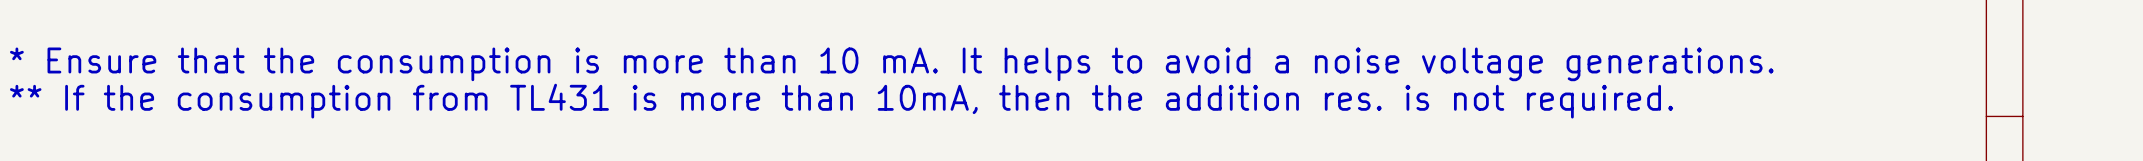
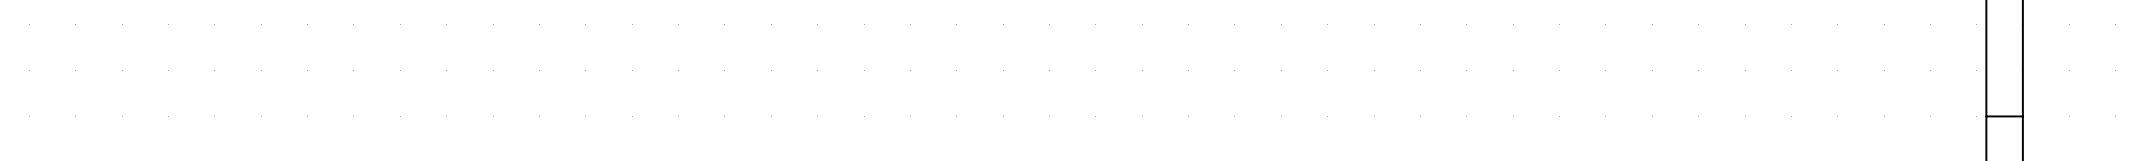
text: * Ensure that the consumption is more than 10 mA. It helps to avoid a noise voltage generations. (891, 64) -> none
text: ** If the consumption from TL431 is more than 10mA, then the addition res. is not required. (841, 101) -> none

